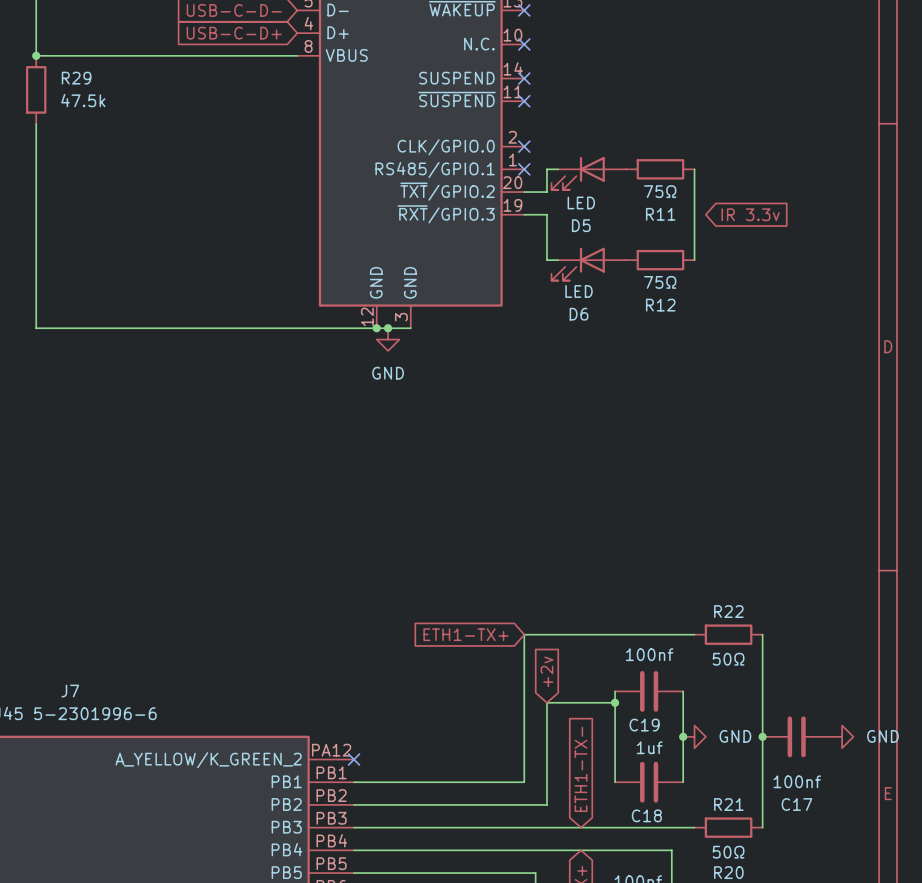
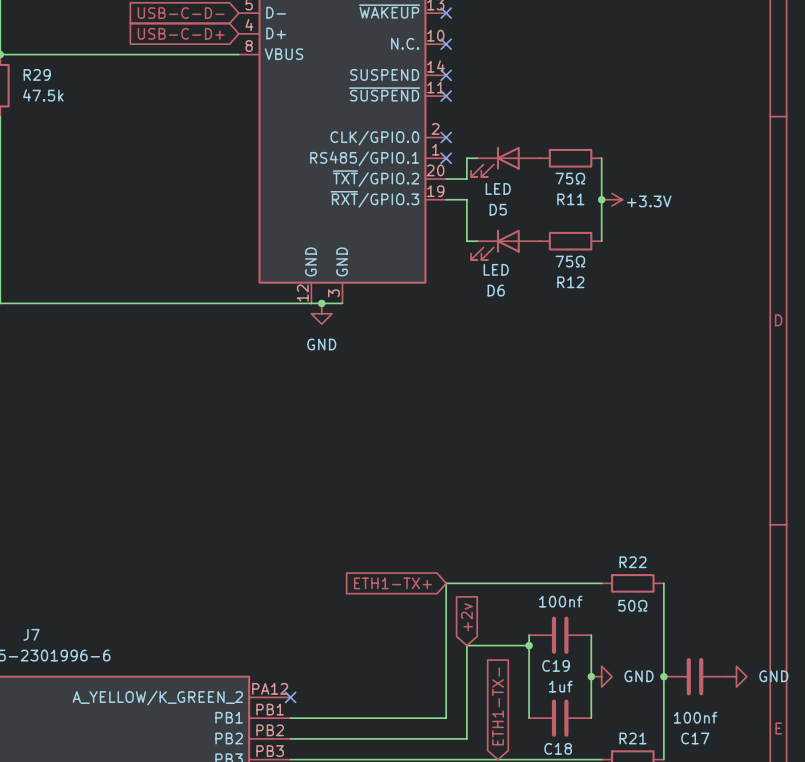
junction: none -> (601, 199)
power symbol: none -> +3.3V (612, 199)
global label: IR 3.3v (750, 214) -> none
junction: (376, 328) -> none

